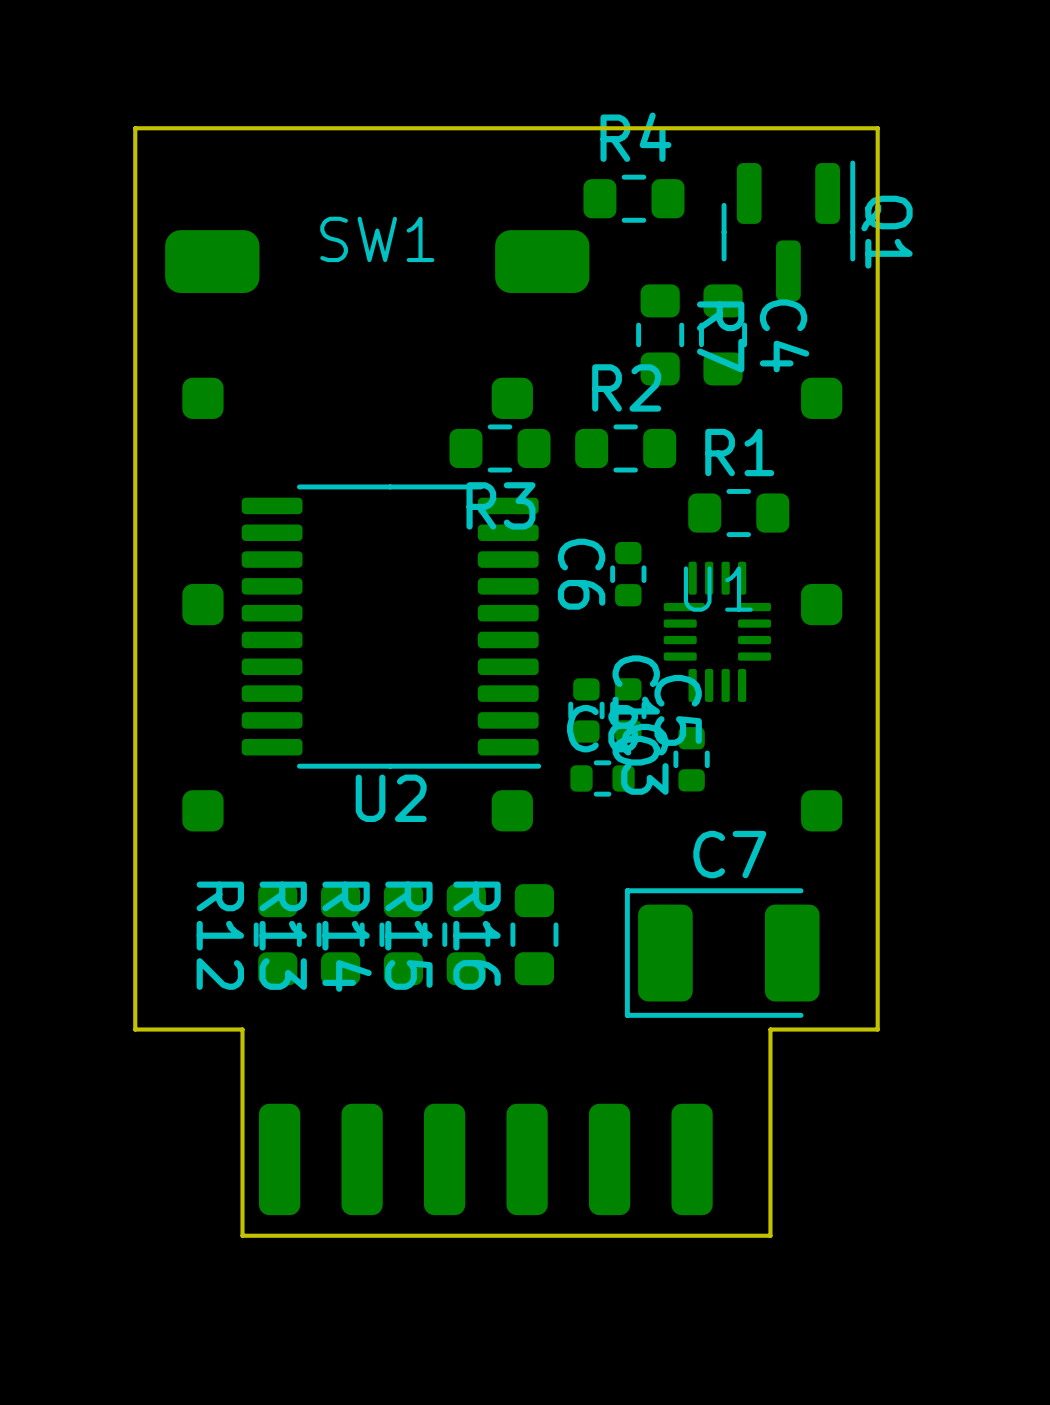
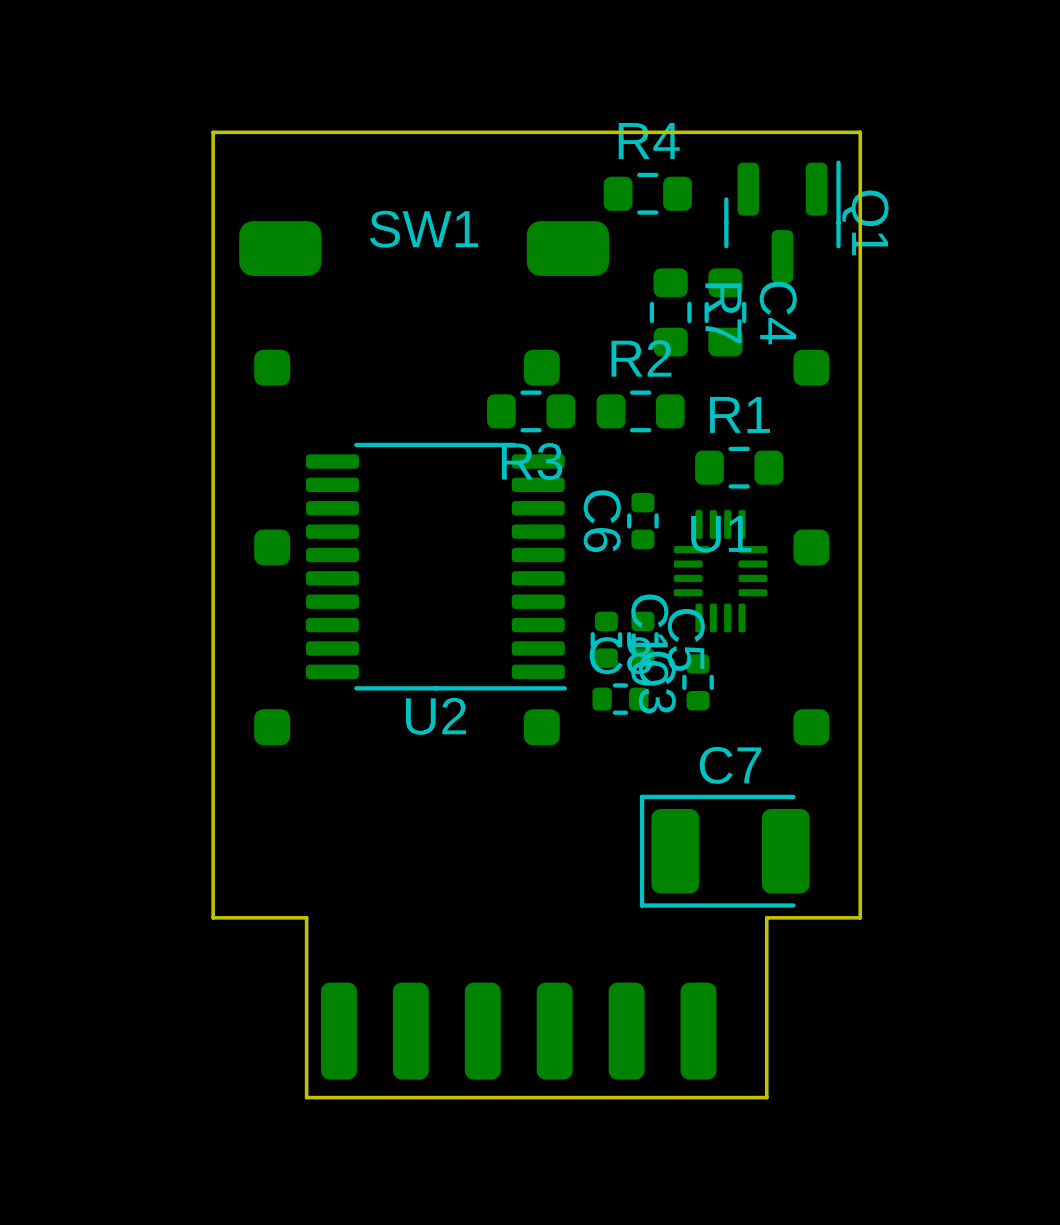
R12: (277, 934) -> none
R13: (340, 934) -> none
R14: (403, 934) -> none
R15: (466, 934) -> none
R16: (534, 934) -> none

